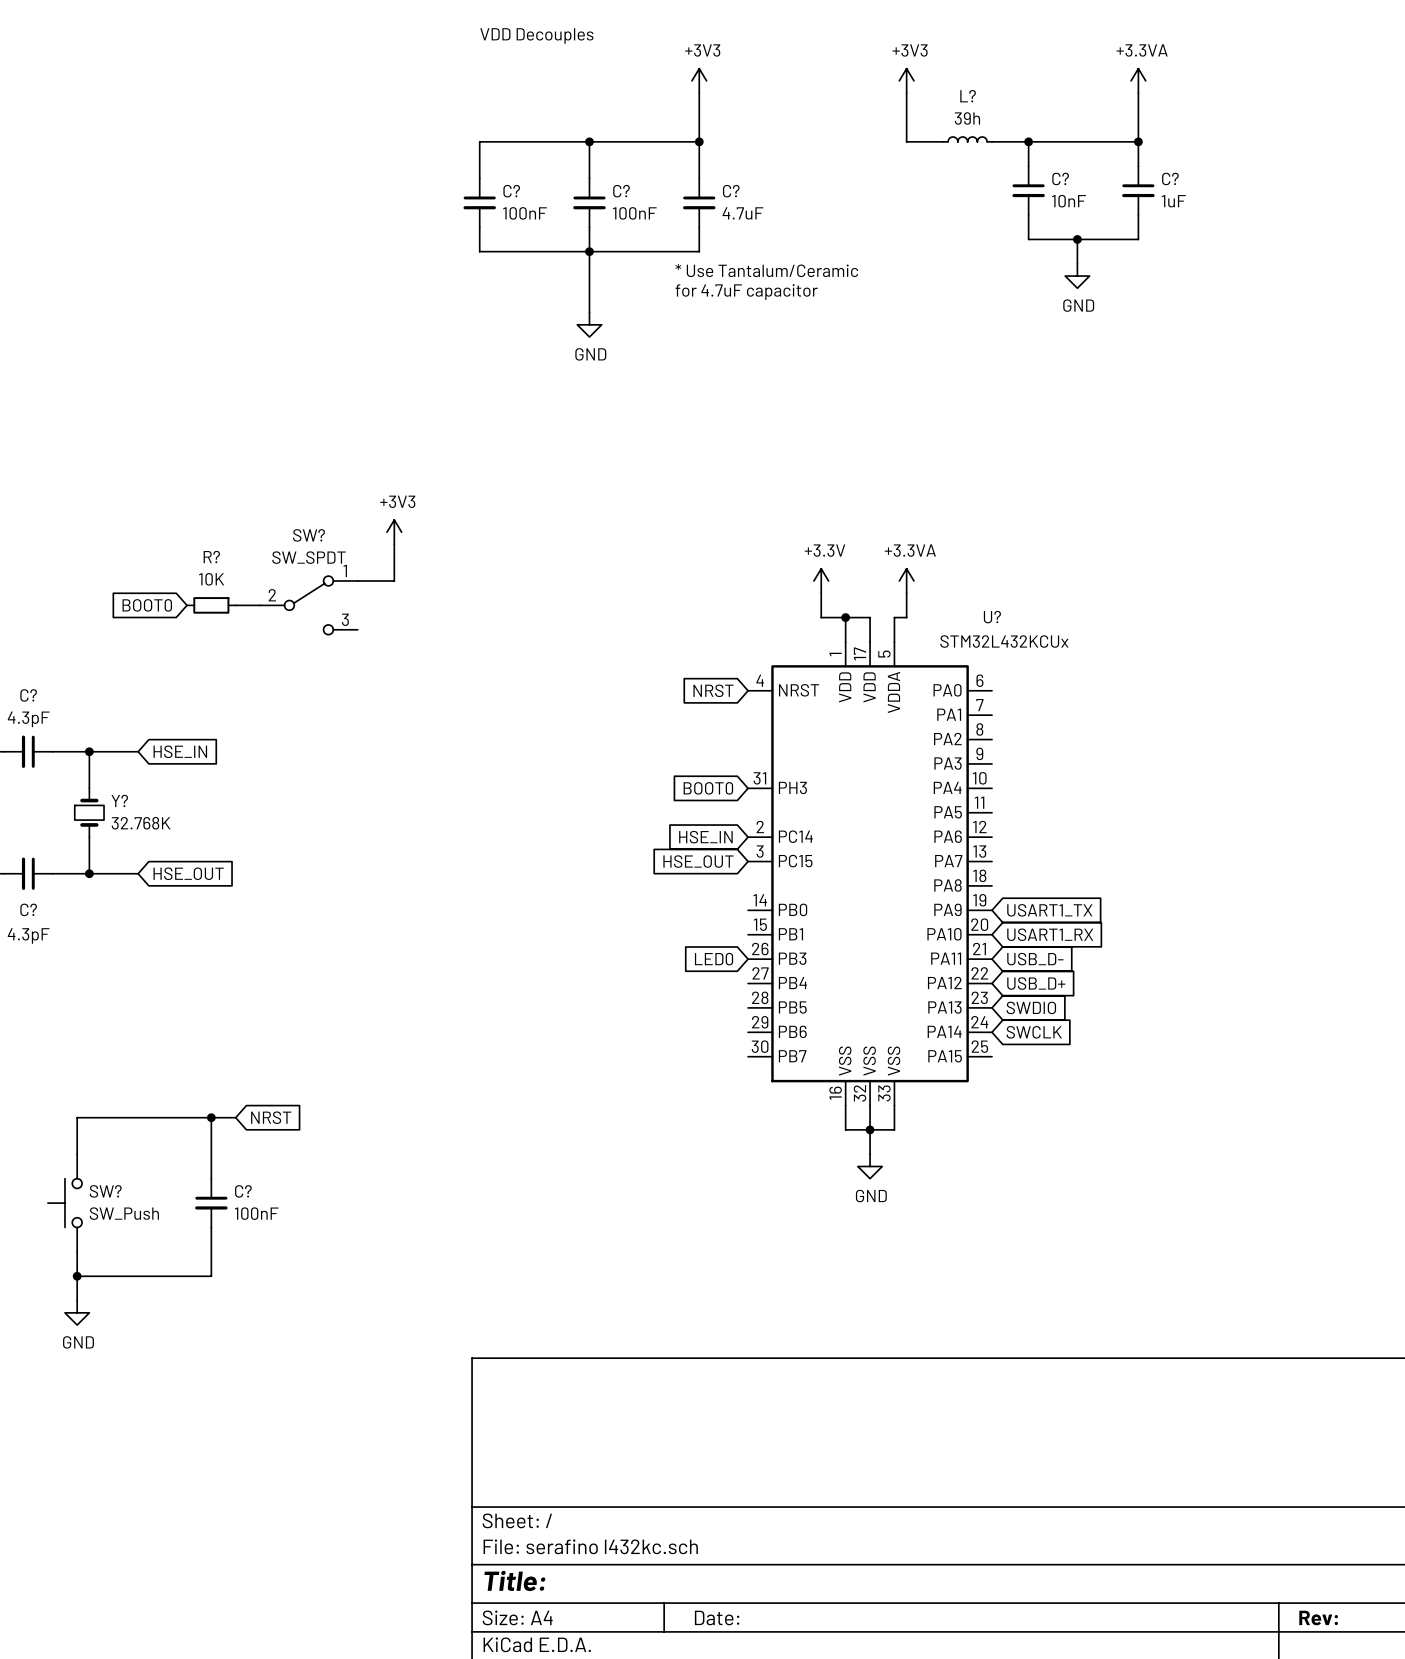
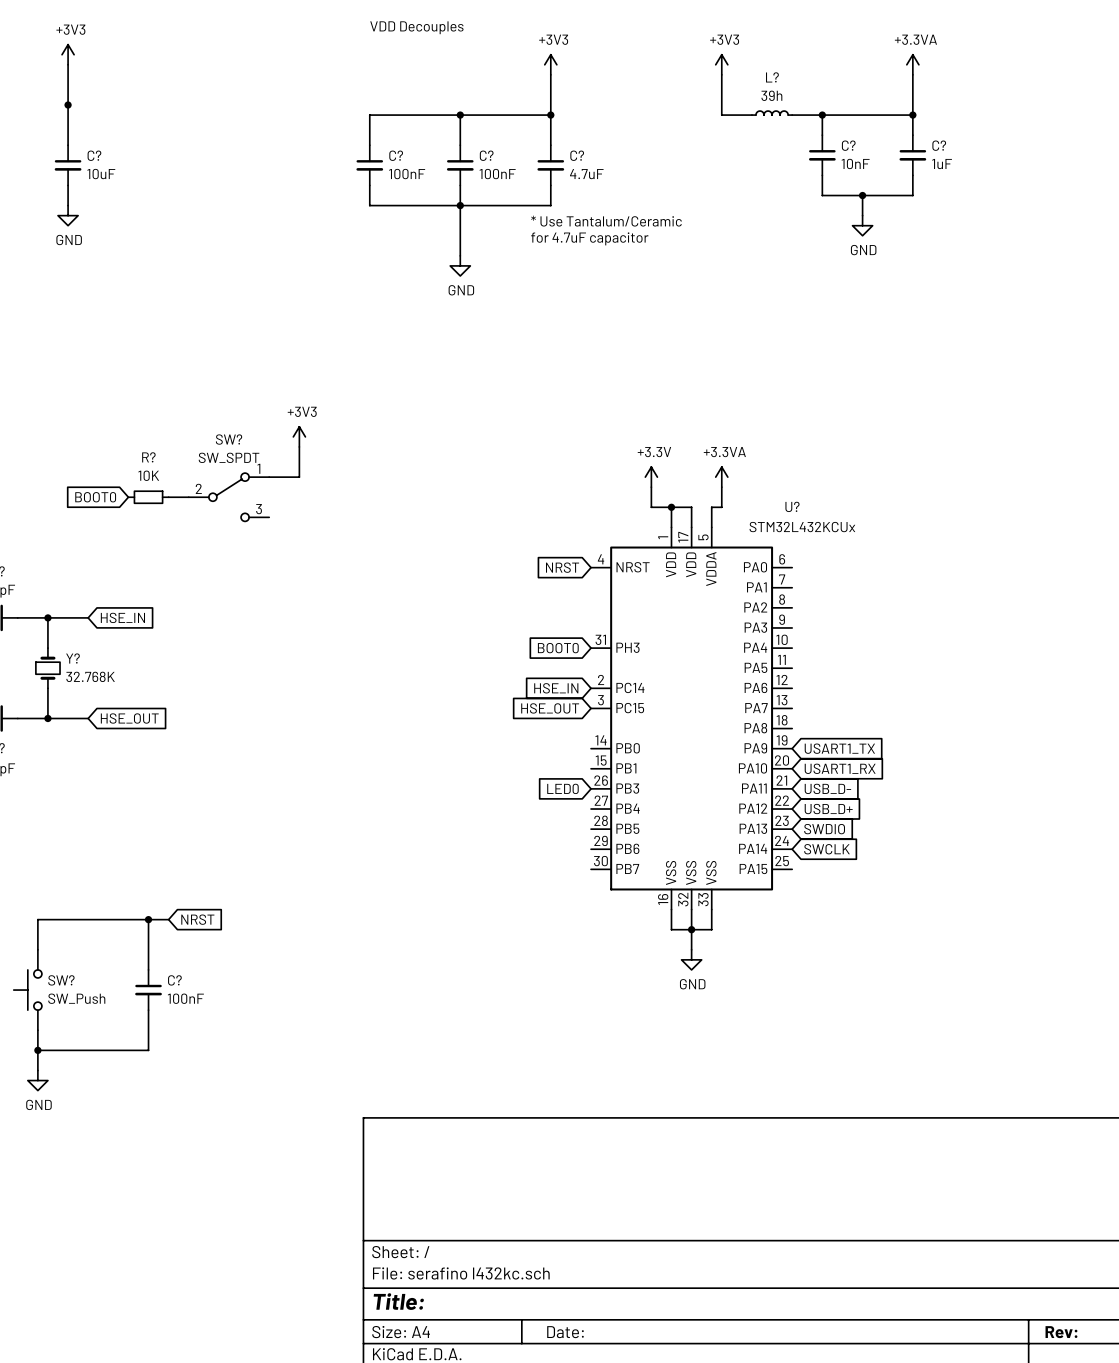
power symbol: none -> +3V3 (68, 54)
wire: none -> (68, 64) (68, 145)
junction: none -> (68, 105)
C?: none -> 10uF (68, 165)
wire: none -> (68, 185) (68, 205)
power symbol: none -> GND (68, 215)

